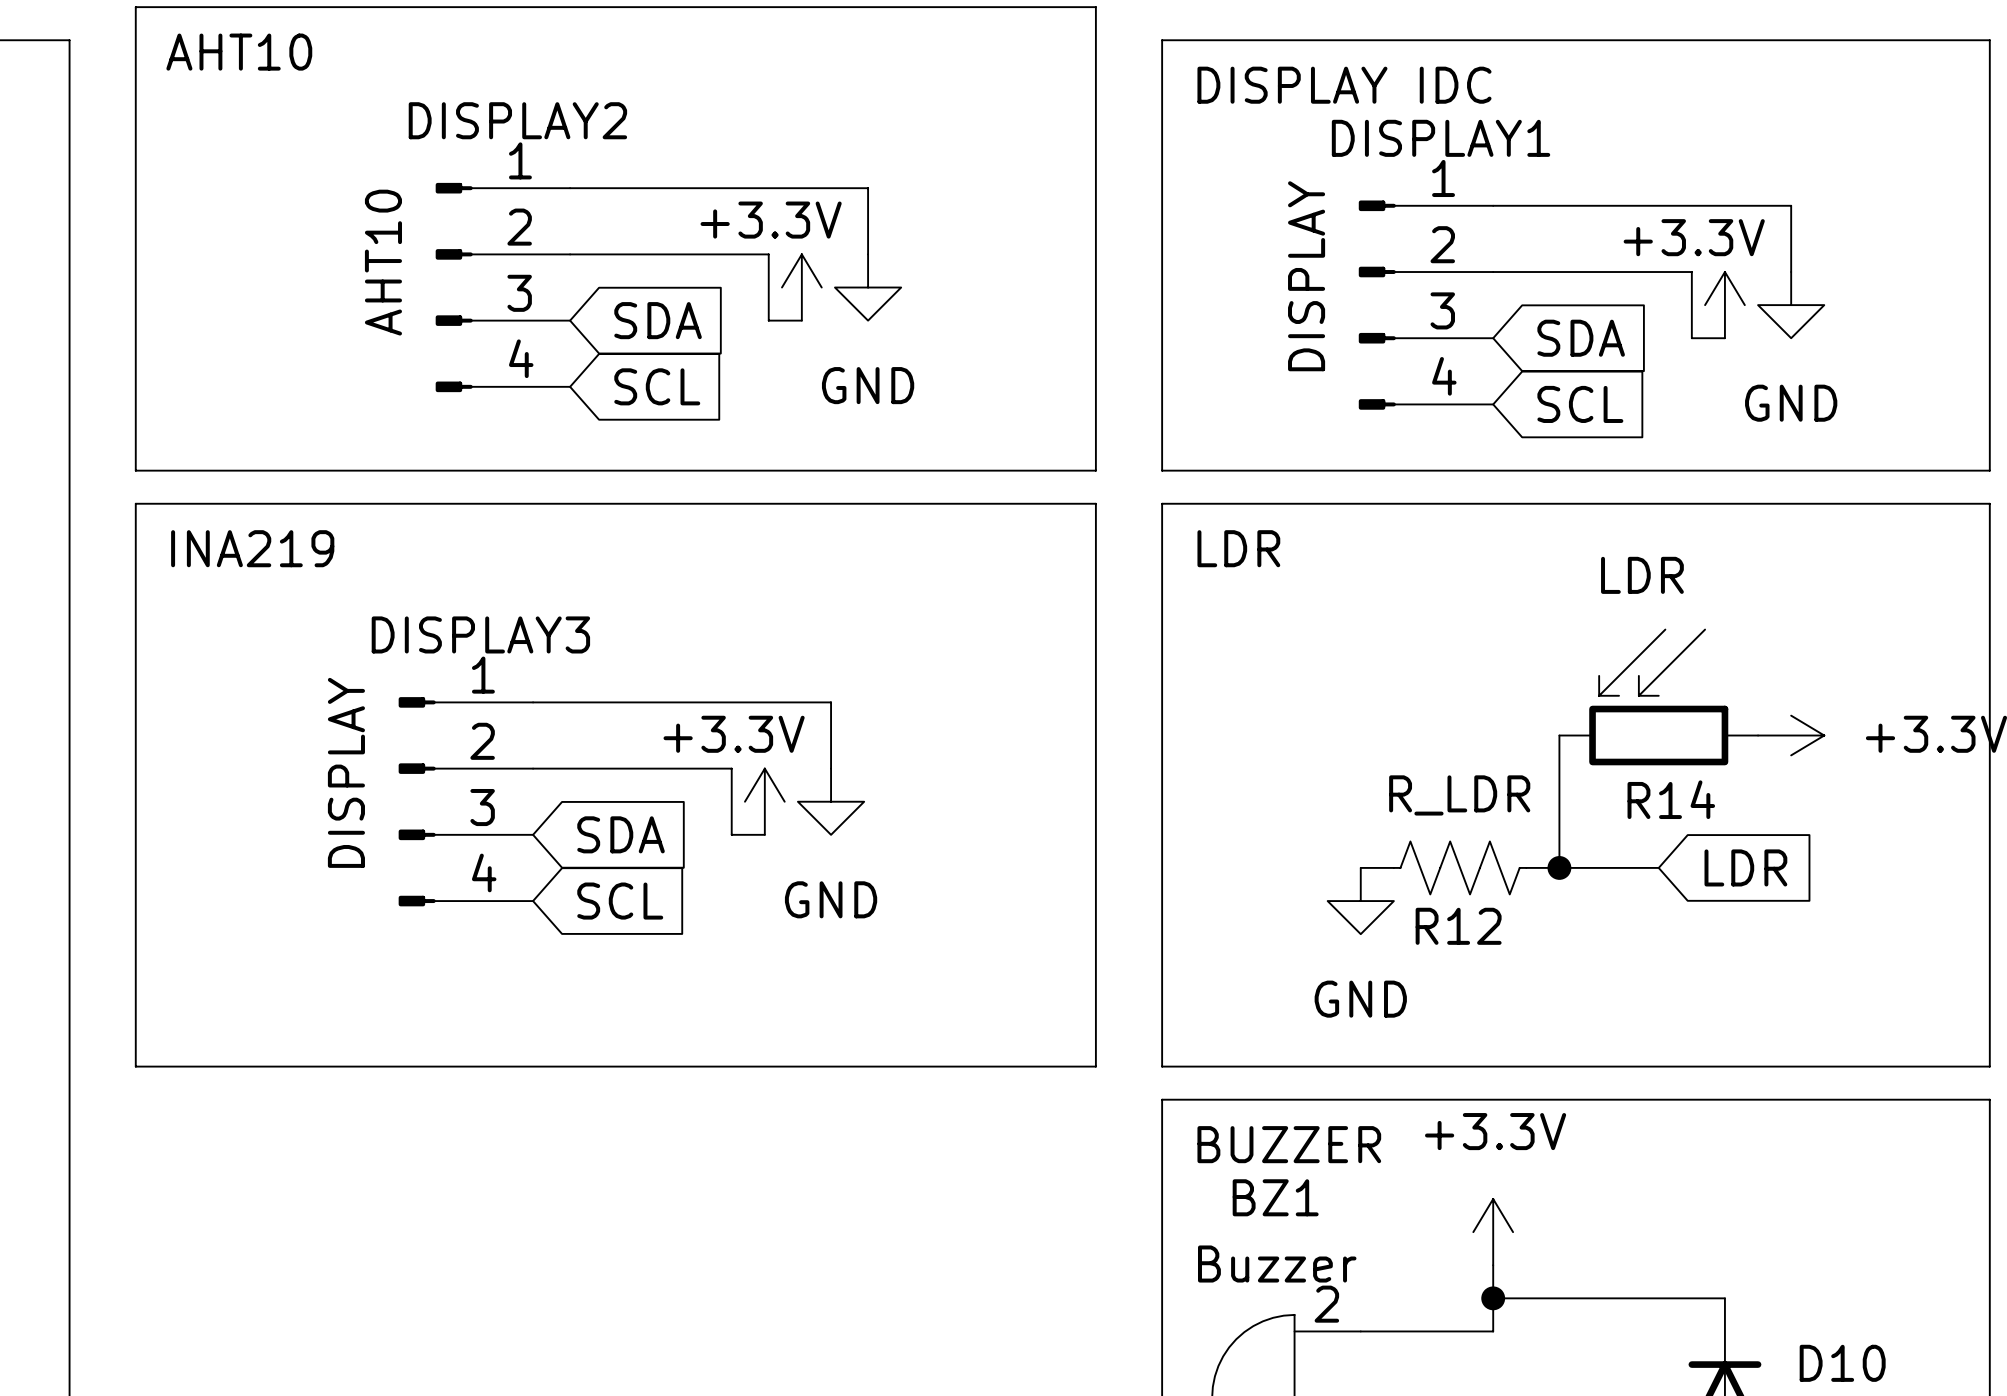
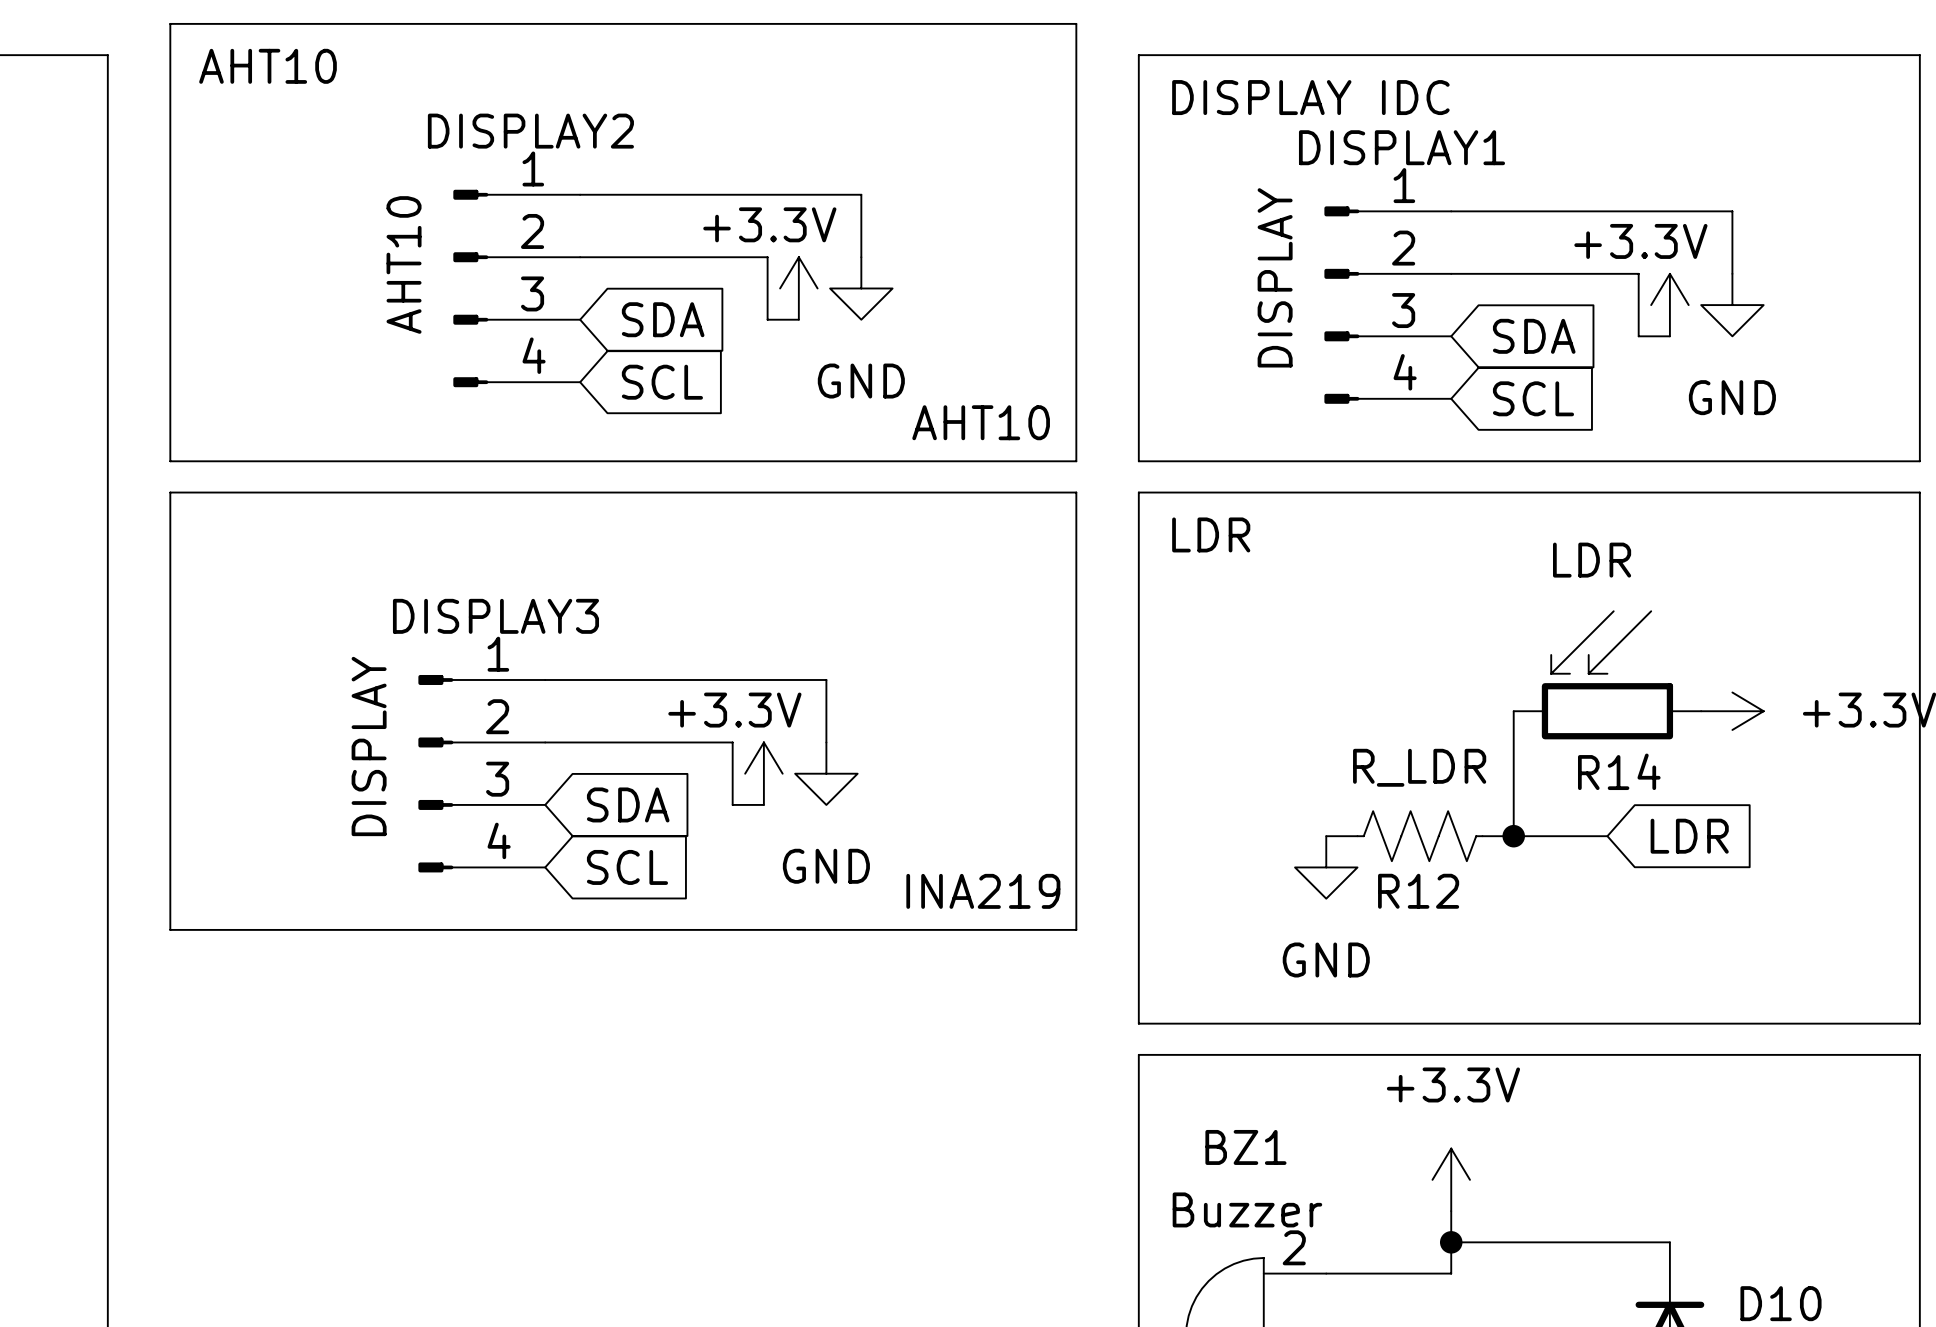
text: none -> AHT10 (981, 422)
text: INA219 (252, 548) -> none
text: none -> INA219 (983, 891)
line: (135, 967) (135, 1066) (1095, 1066) (1095, 967) -> (170, 929) (1076, 929)
text: BUZZER (1289, 1144) -> none

